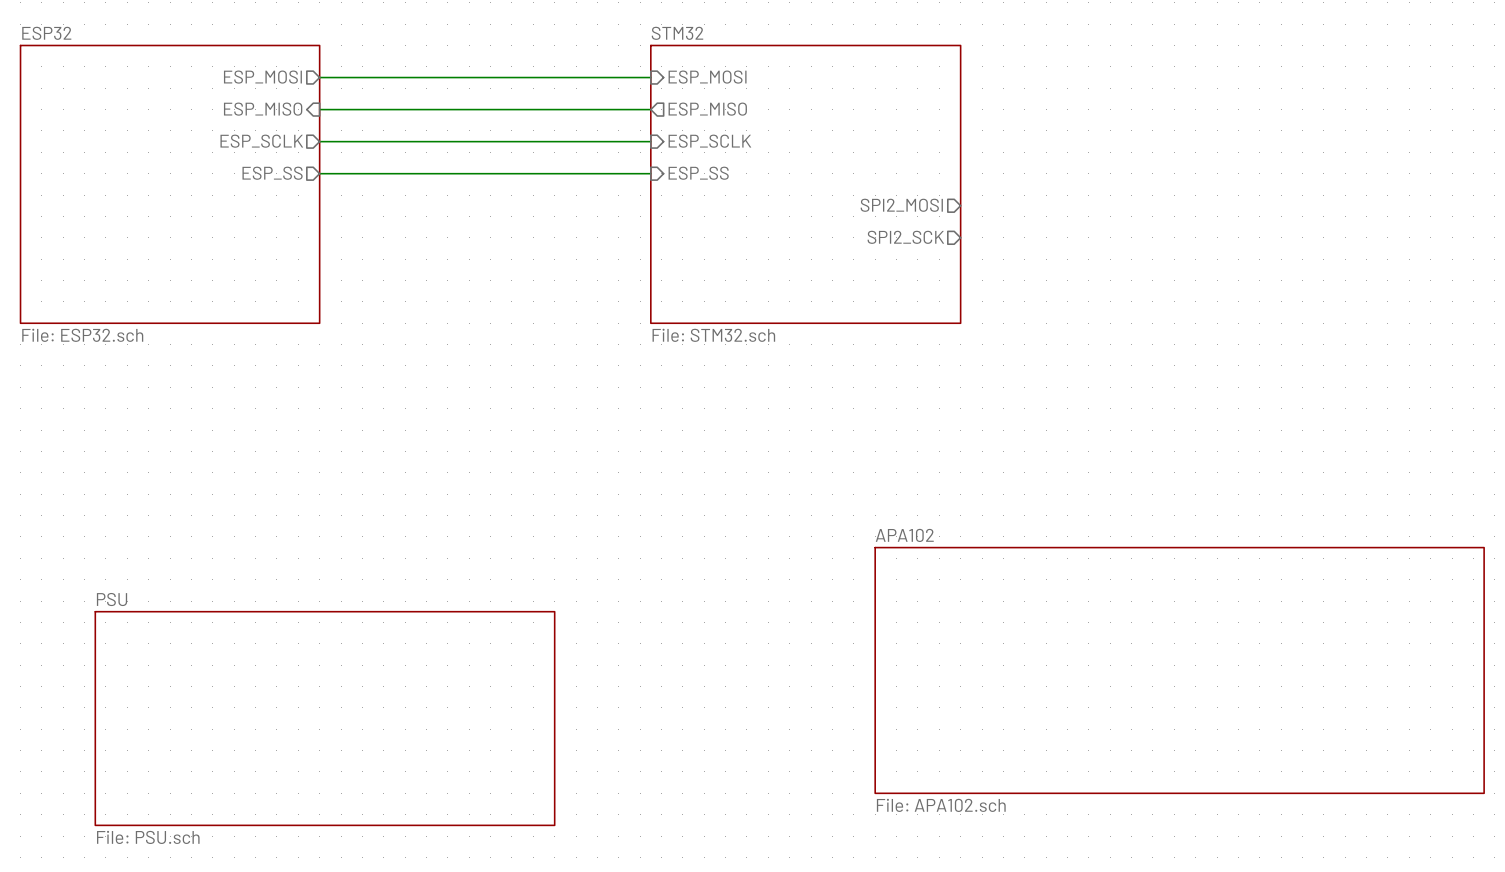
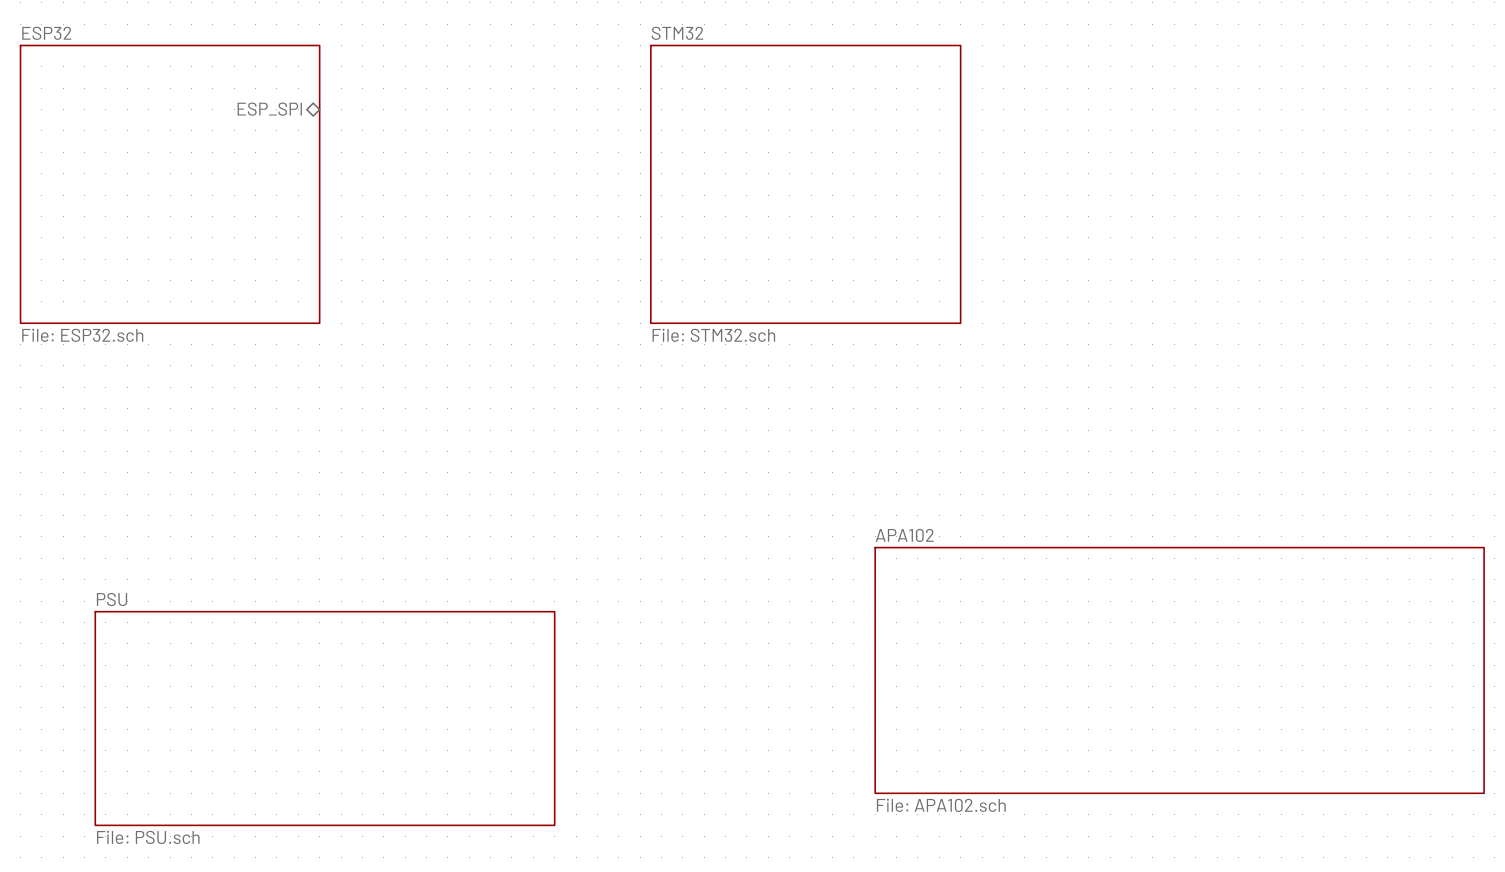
sheet pin: ESP_MOSI (262, 77) -> none
wire: (319, 77) (650, 77) -> none
sheet pin: ESP_MOSI (707, 77) -> none
sheet pin shape: input (263, 109) -> bidirectional (269, 109)
sheet pin: ESP_MISO (263, 109) -> ESP_SPI (269, 109)
wire: (319, 109) (650, 109) -> none
sheet pin: ESP_MISO (707, 109) -> none
sheet pin: ESP_SCLK (261, 141) -> none
wire: (319, 141) (650, 141) -> none
sheet pin: ESP_SCLK (709, 141) -> none
sheet pin: ESP_SS (272, 173) -> none
wire: (319, 173) (650, 173) -> none
sheet pin: ESP_SS (698, 173) -> none
sheet pin: SPI2_MOSI (901, 205) -> none
sheet pin: SPI2_SCK (905, 237) -> none

